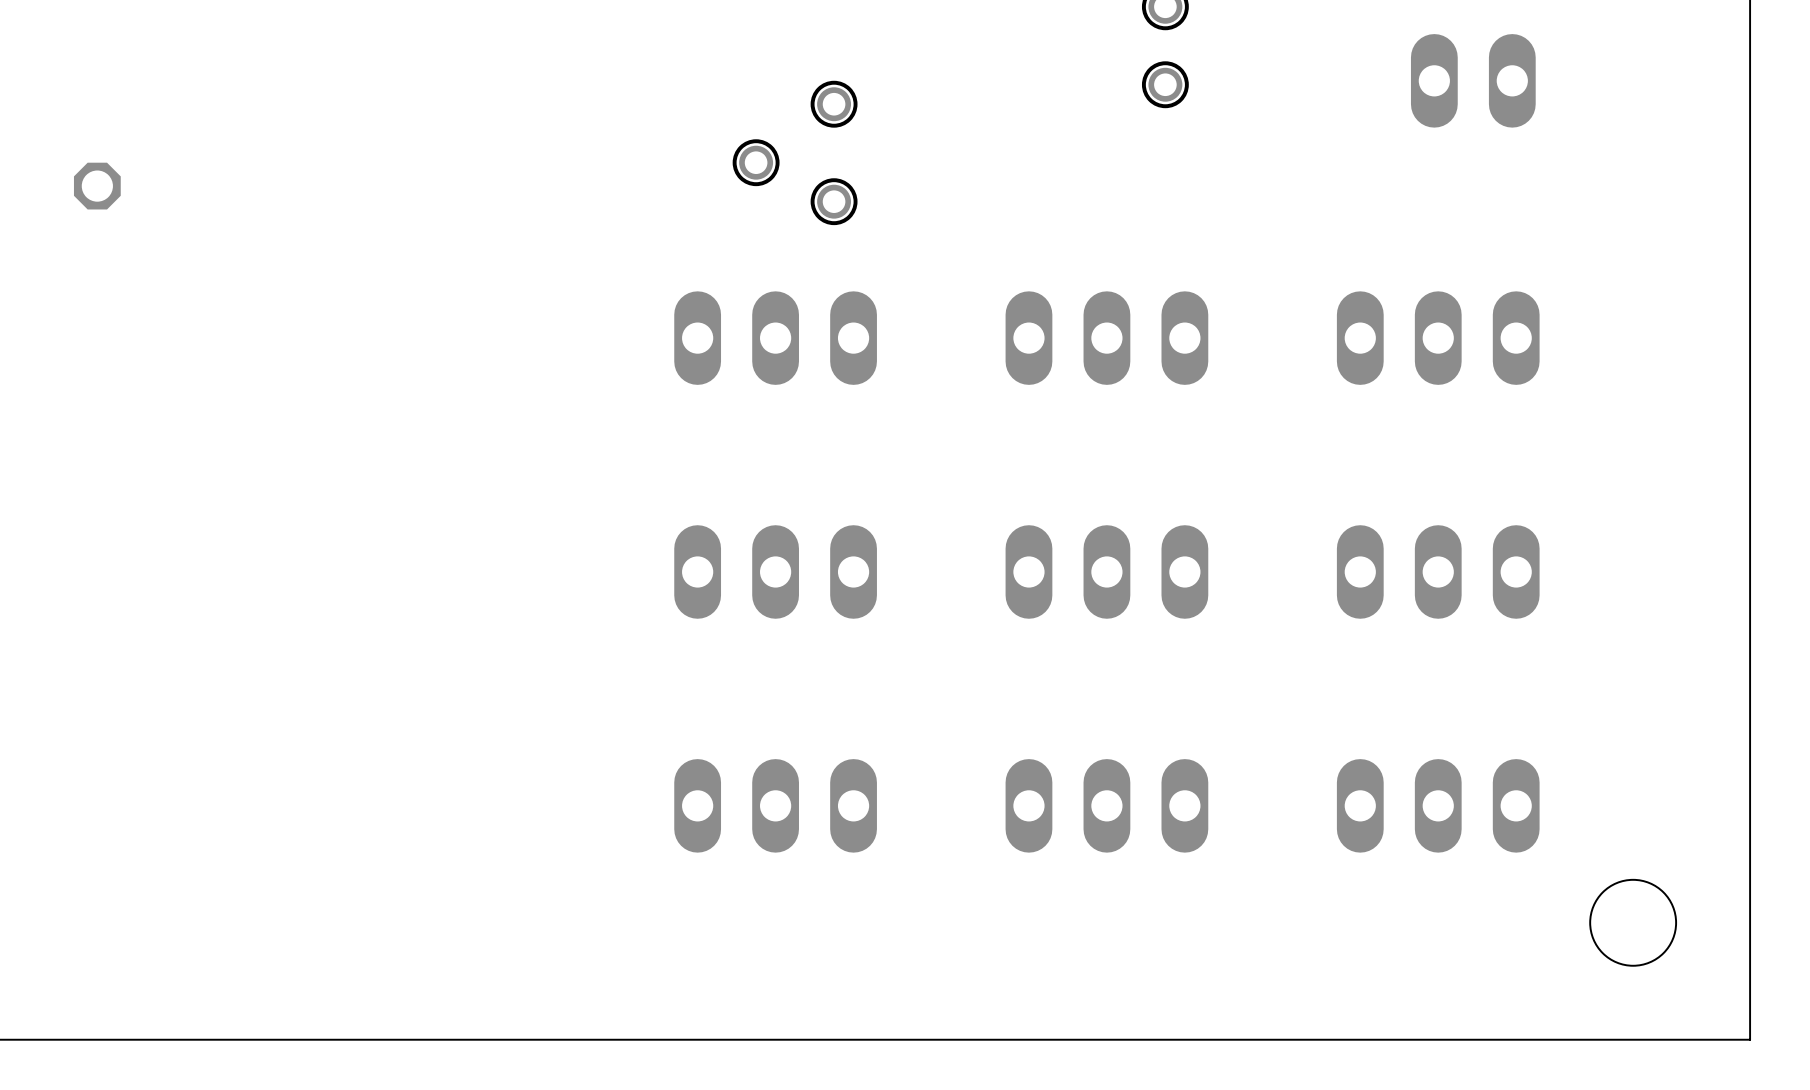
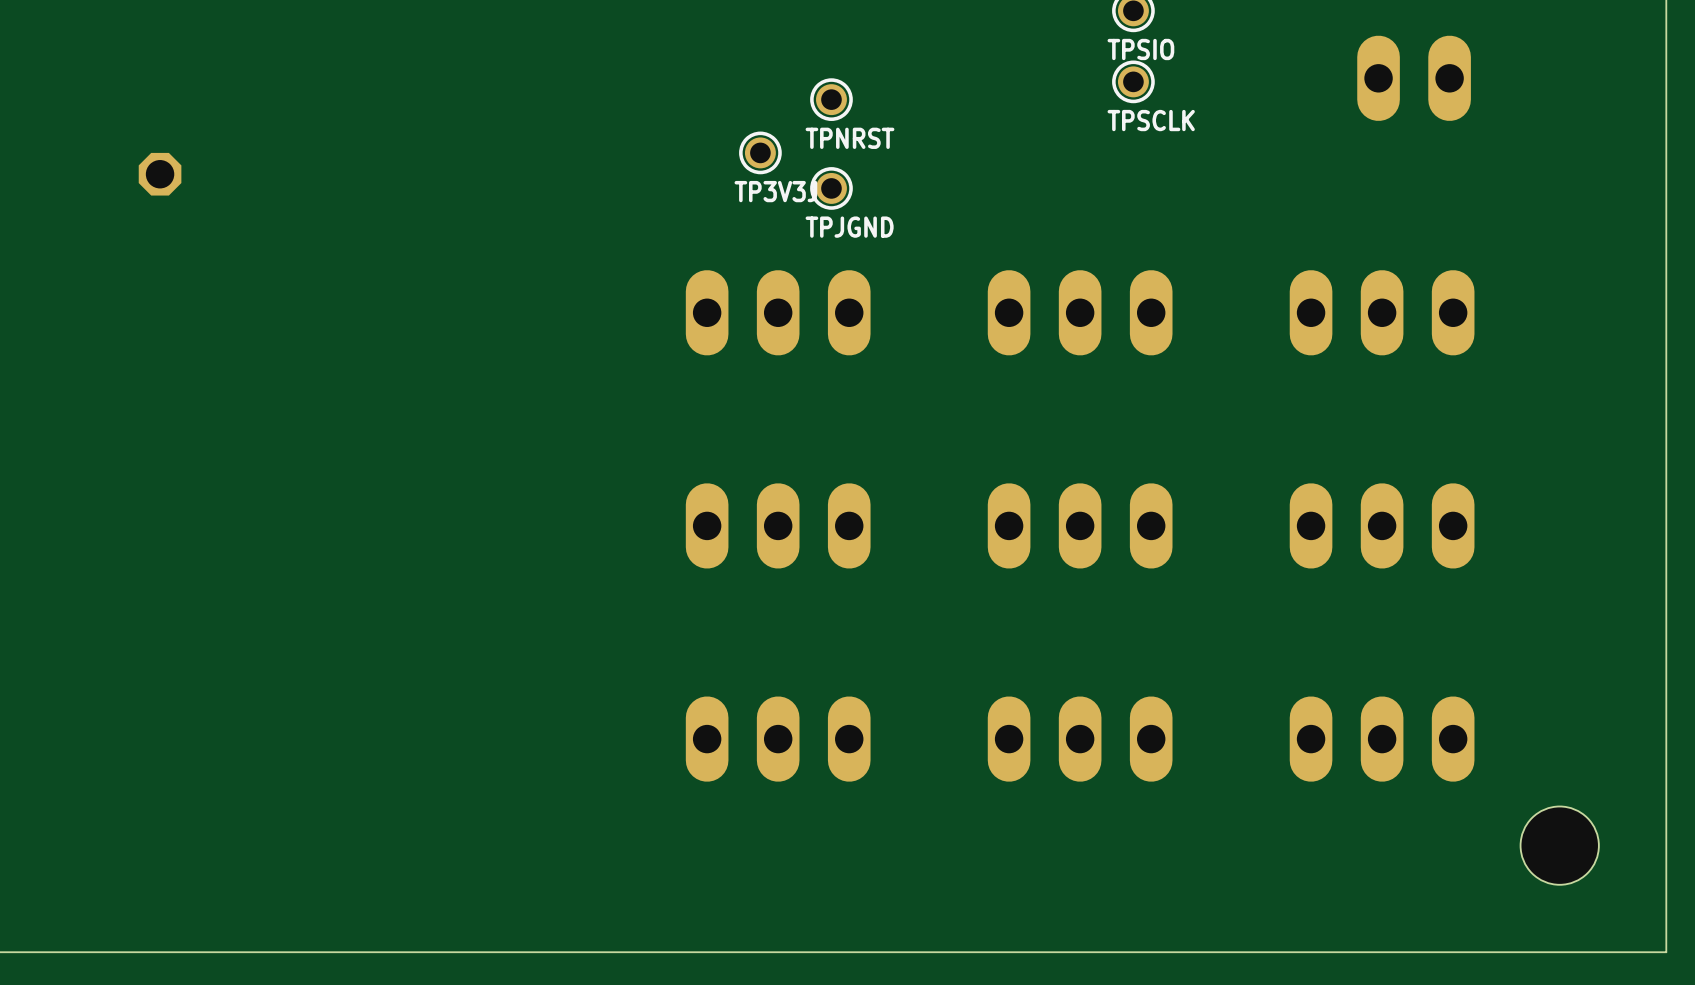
TPSIO name: none -> TPSIO (1140, 49)
TPSCLK name: none -> TPSCLK (1151, 120)
TPNRST name: none -> TPNRST (849, 138)
TP3V3J name: none -> TP3V3J (775, 191)
TPJGND name: none -> TPJGND (849, 227)

